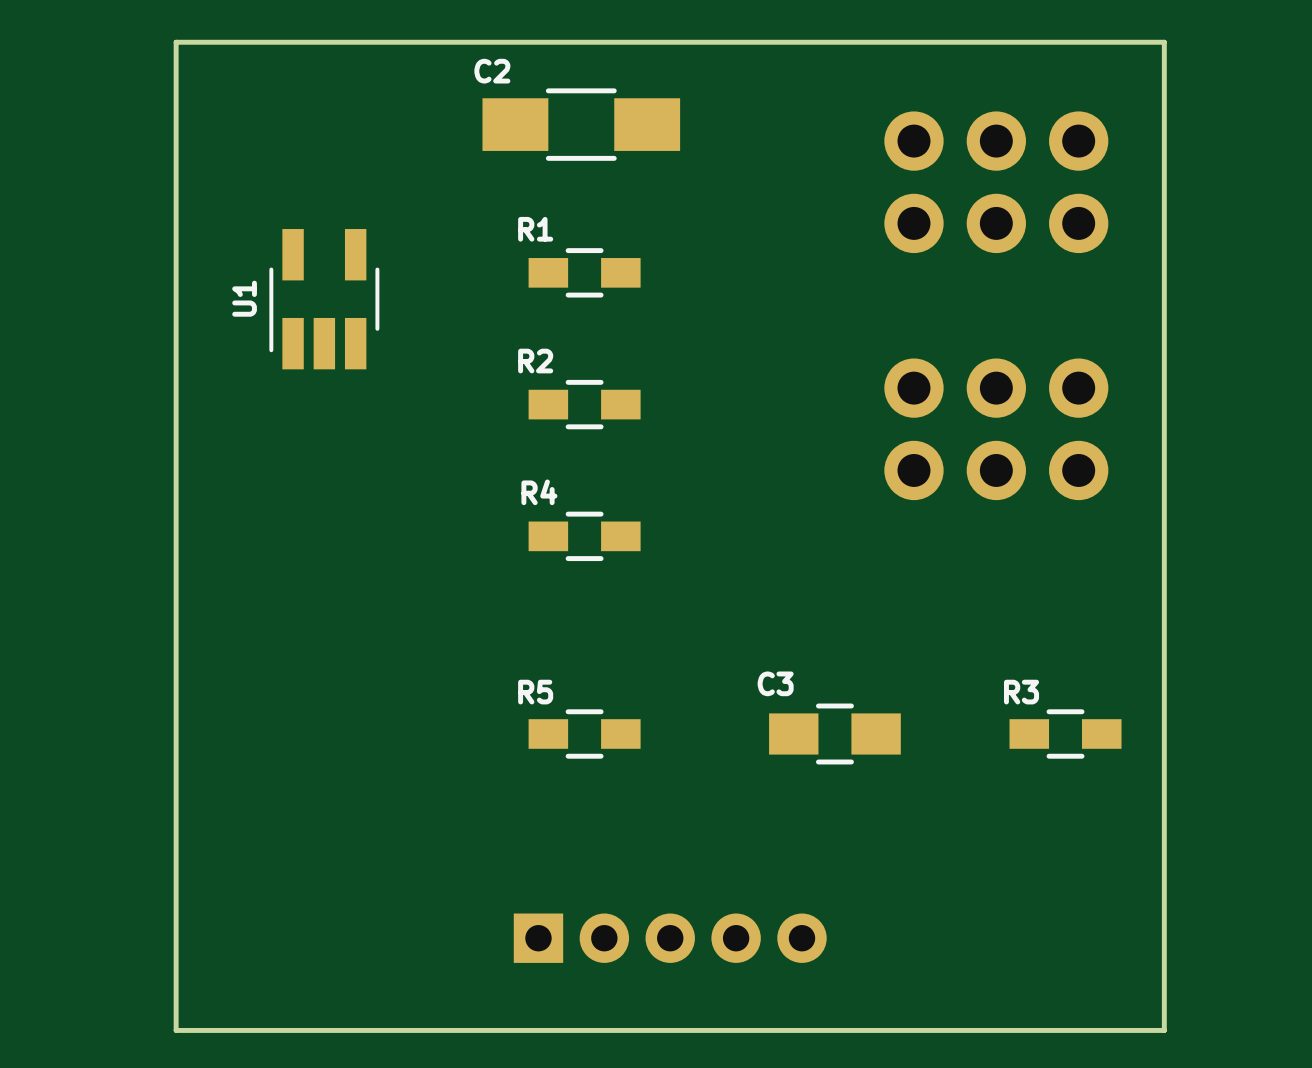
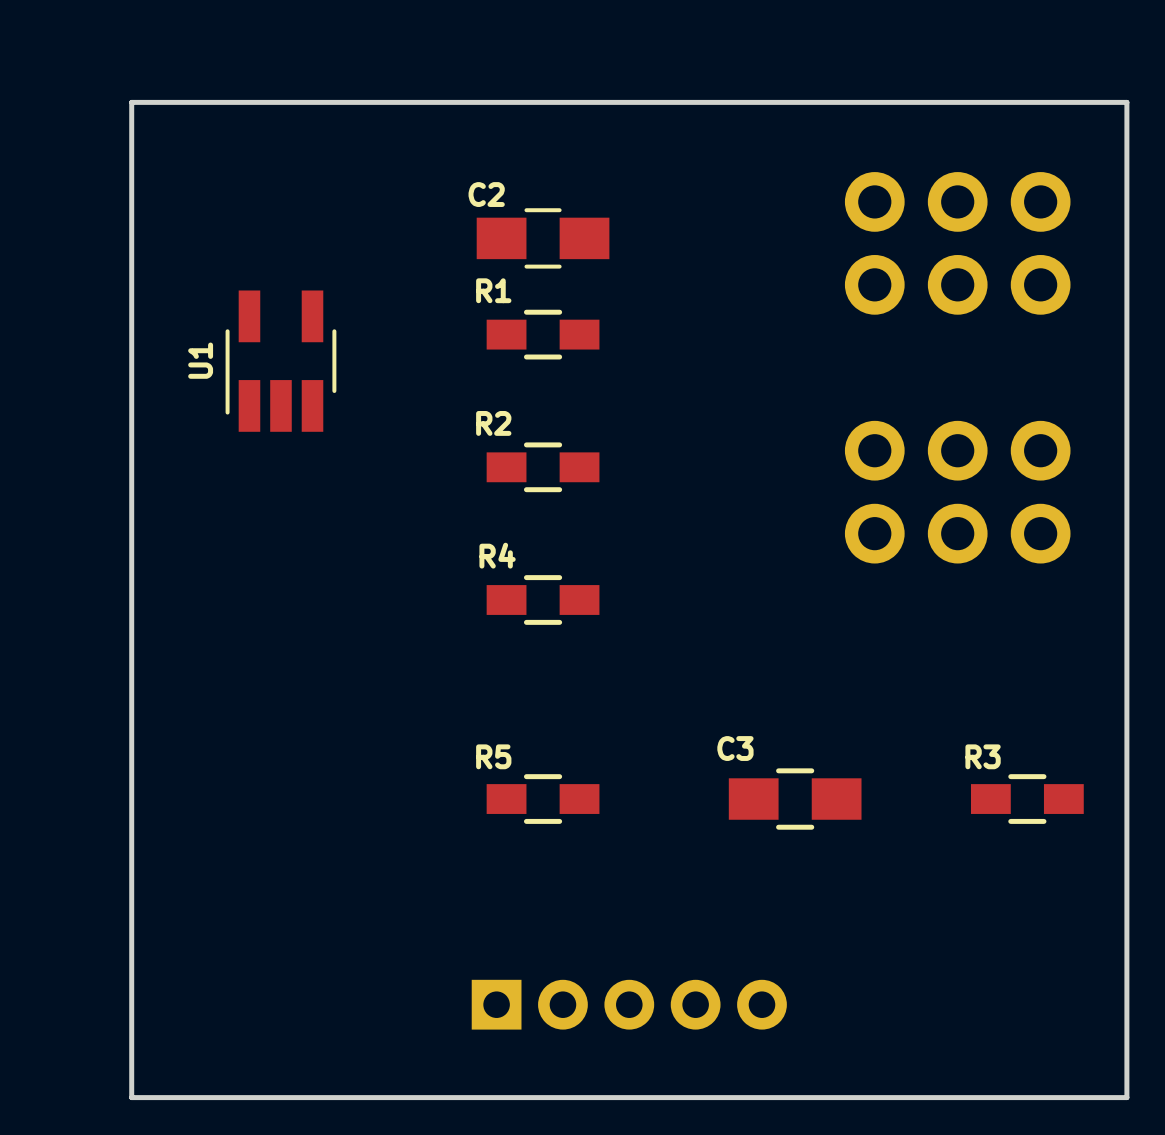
C2 footprint: [482, 88, 681, 161] -> [476, 208, 610, 269]

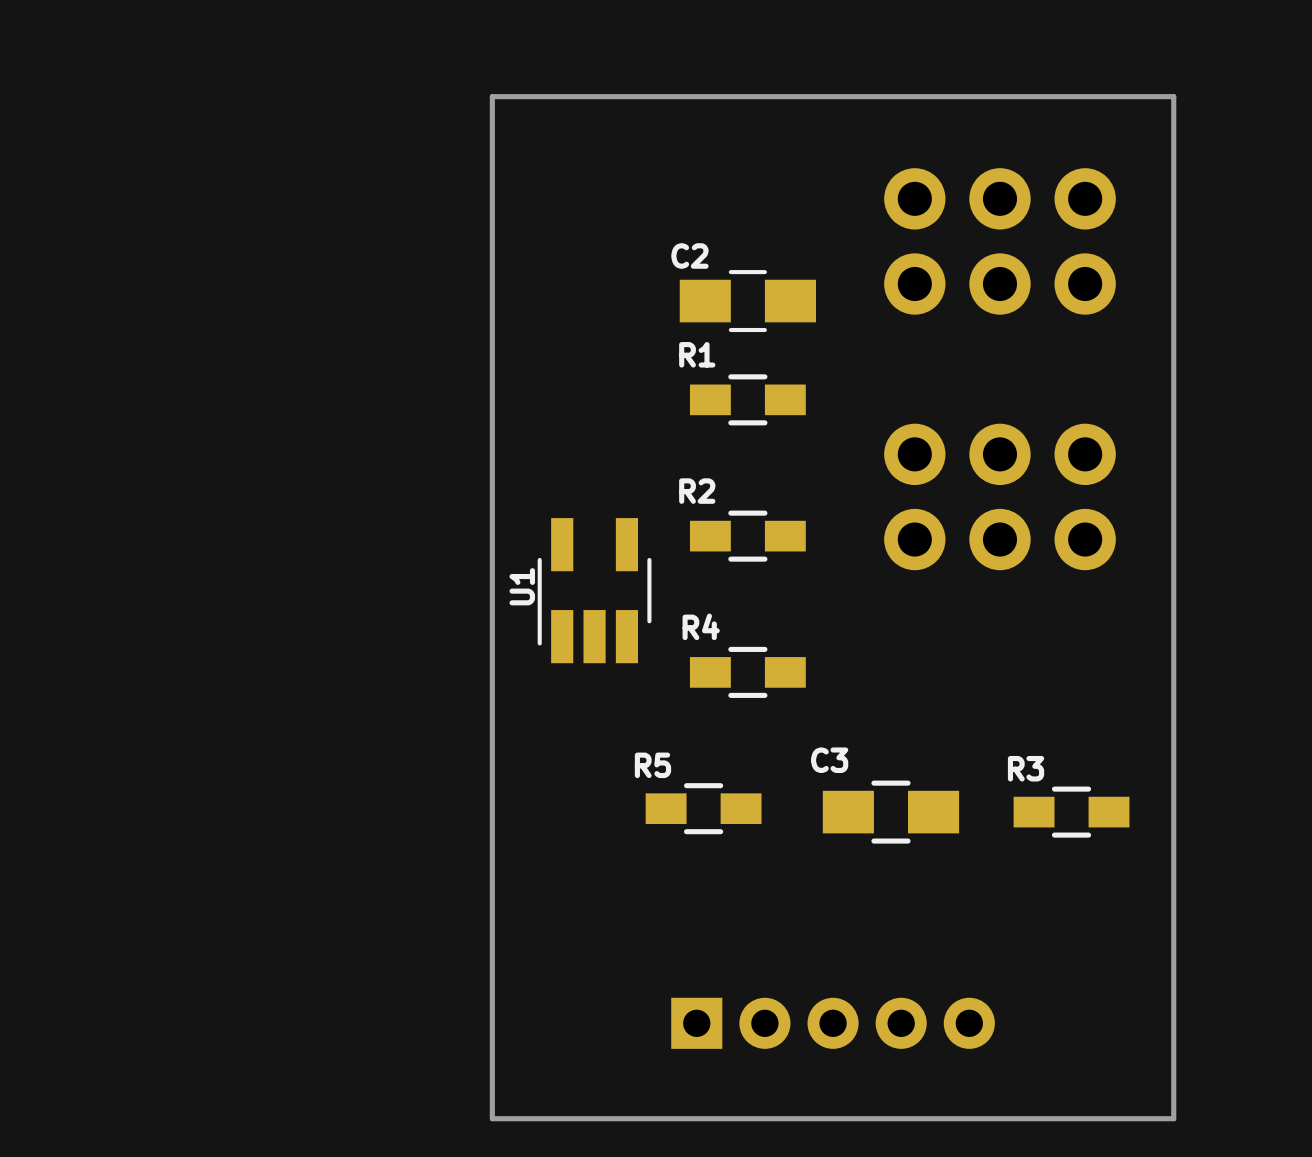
board edge: (463, 102) (131, 102) (131, 1097) (463, 1097) -> (492, 96) (492, 1118)
C2 position: (543, 238) -> (747, 301)
R1 position: (543, 334) -> (747, 399)
U1 name position: U1 (200, 360) -> U1 (522, 586)
U1 position: (280, 361) -> (594, 590)
R2 position: (543, 467) -> (747, 536)
R4 position: (543, 599) -> (747, 672)
R5 position: (543, 799) -> (703, 808)
C3 position: (795, 799) -> (890, 812)
part position: (629, 1004) -> (833, 1023)

